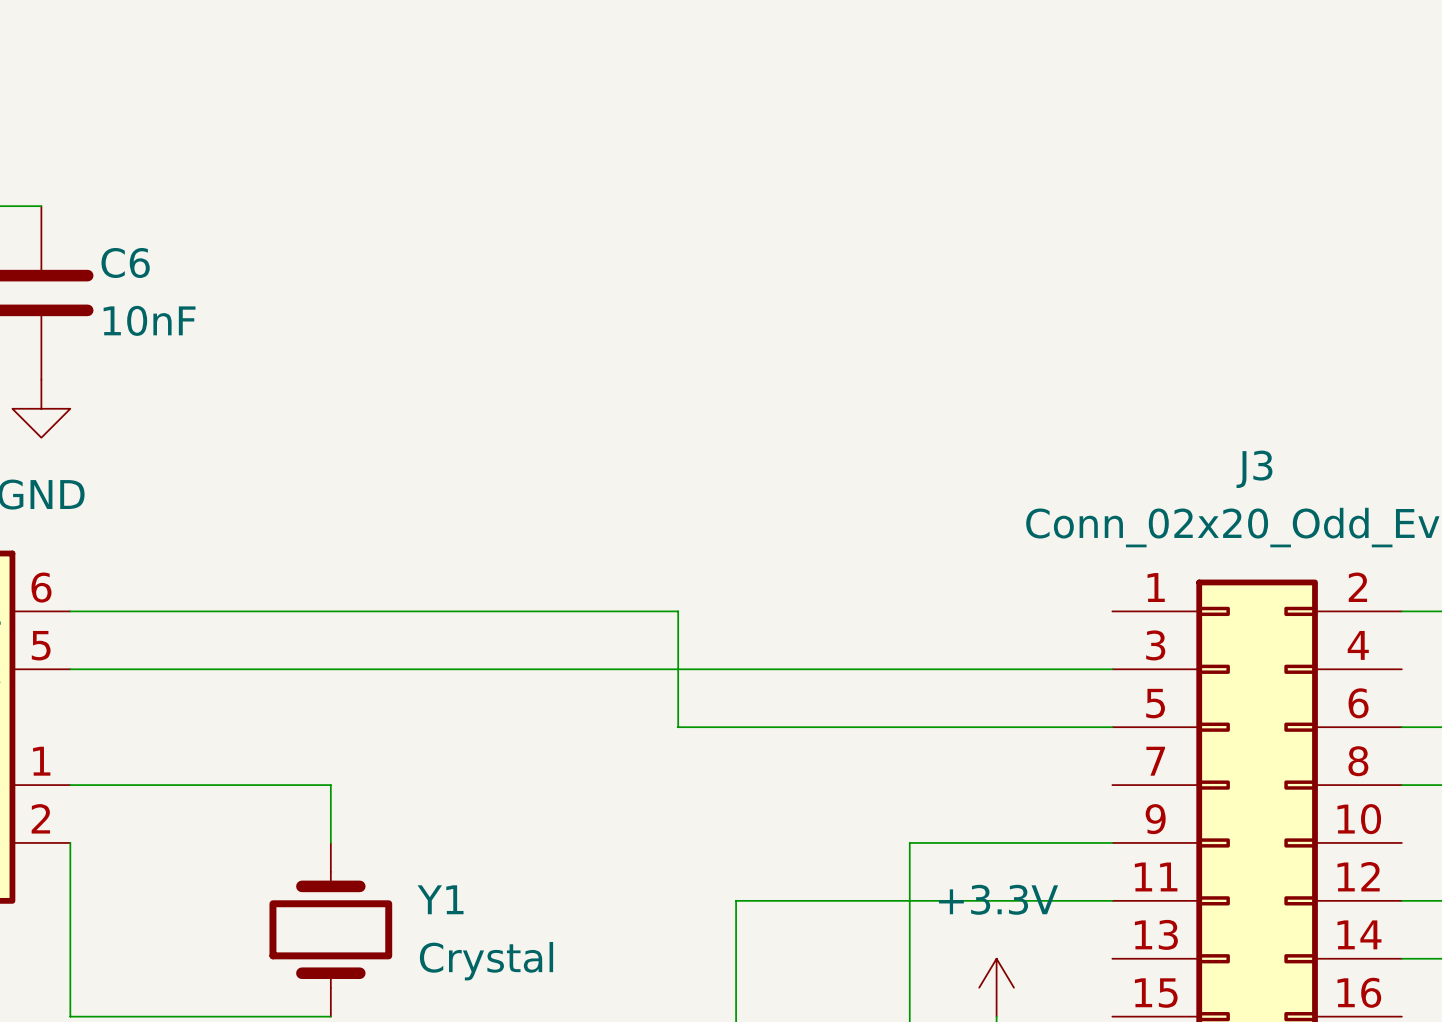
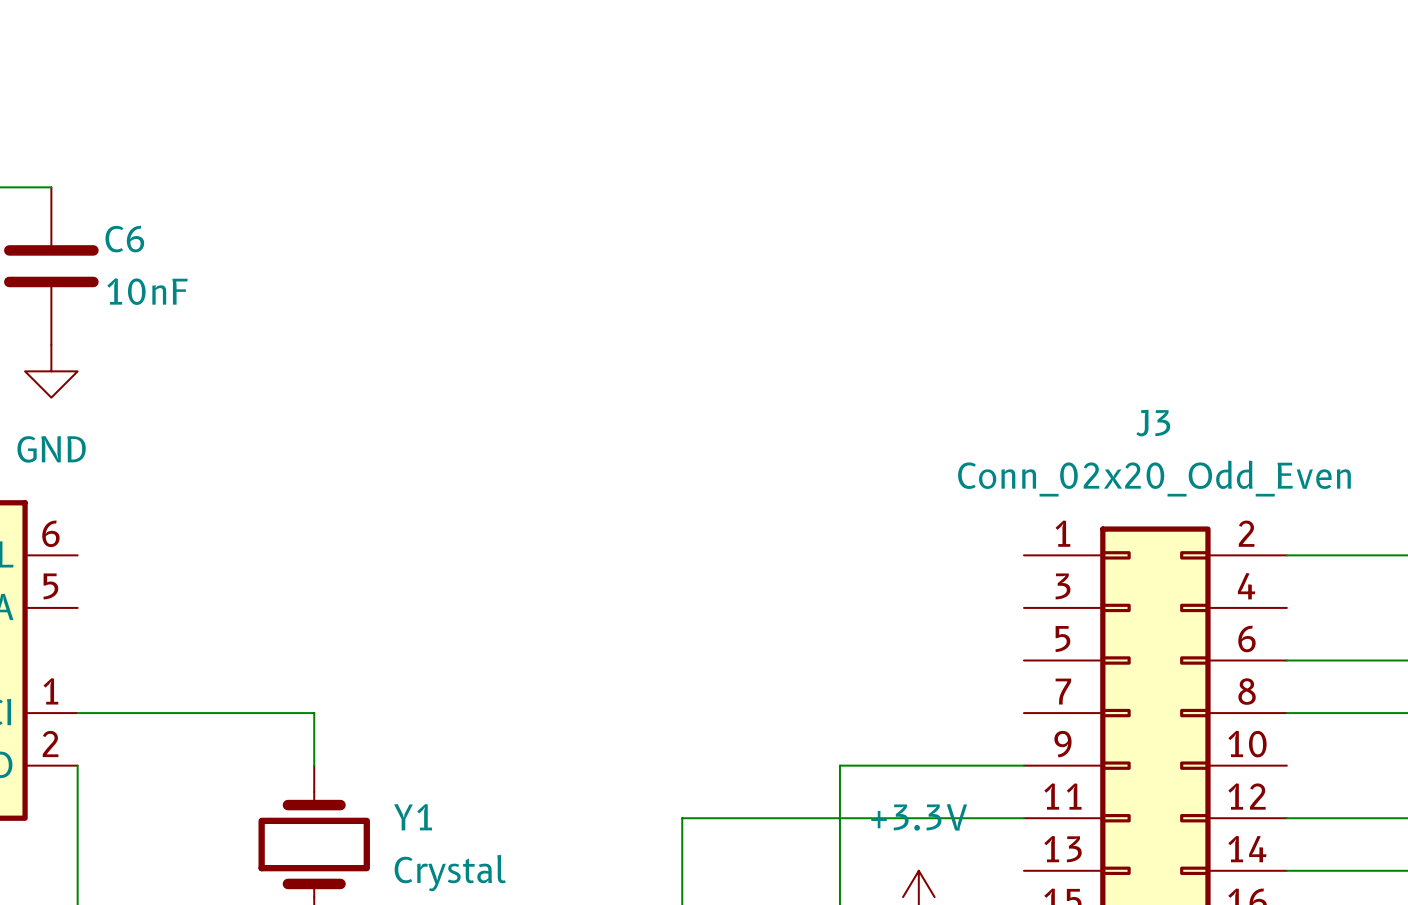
wire: (70, 611) (678, 611) (678, 727) (1112, 727) -> none
wire: (70, 669) (1112, 669) -> none

